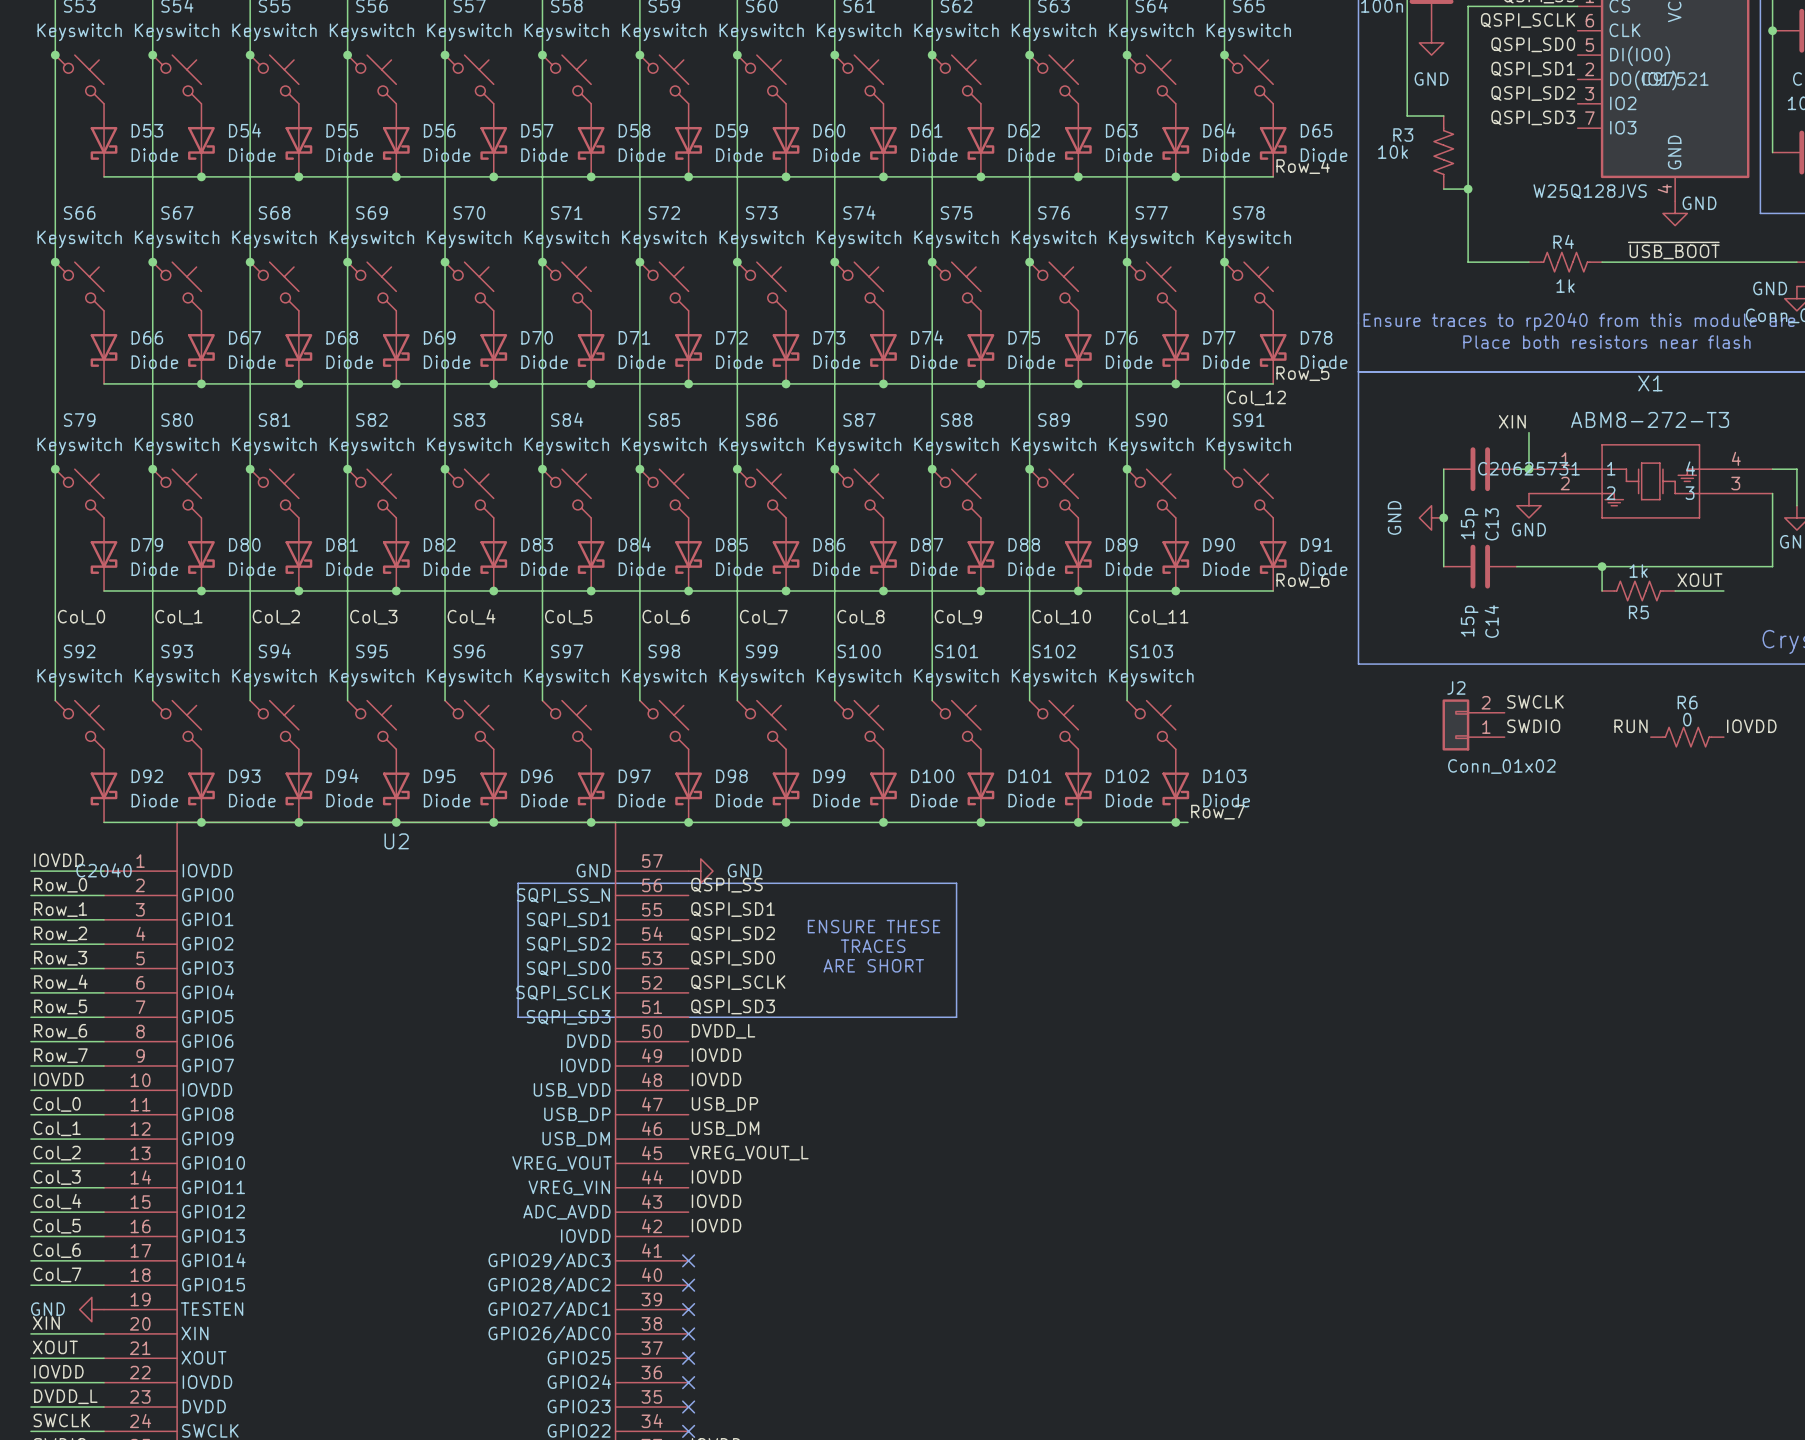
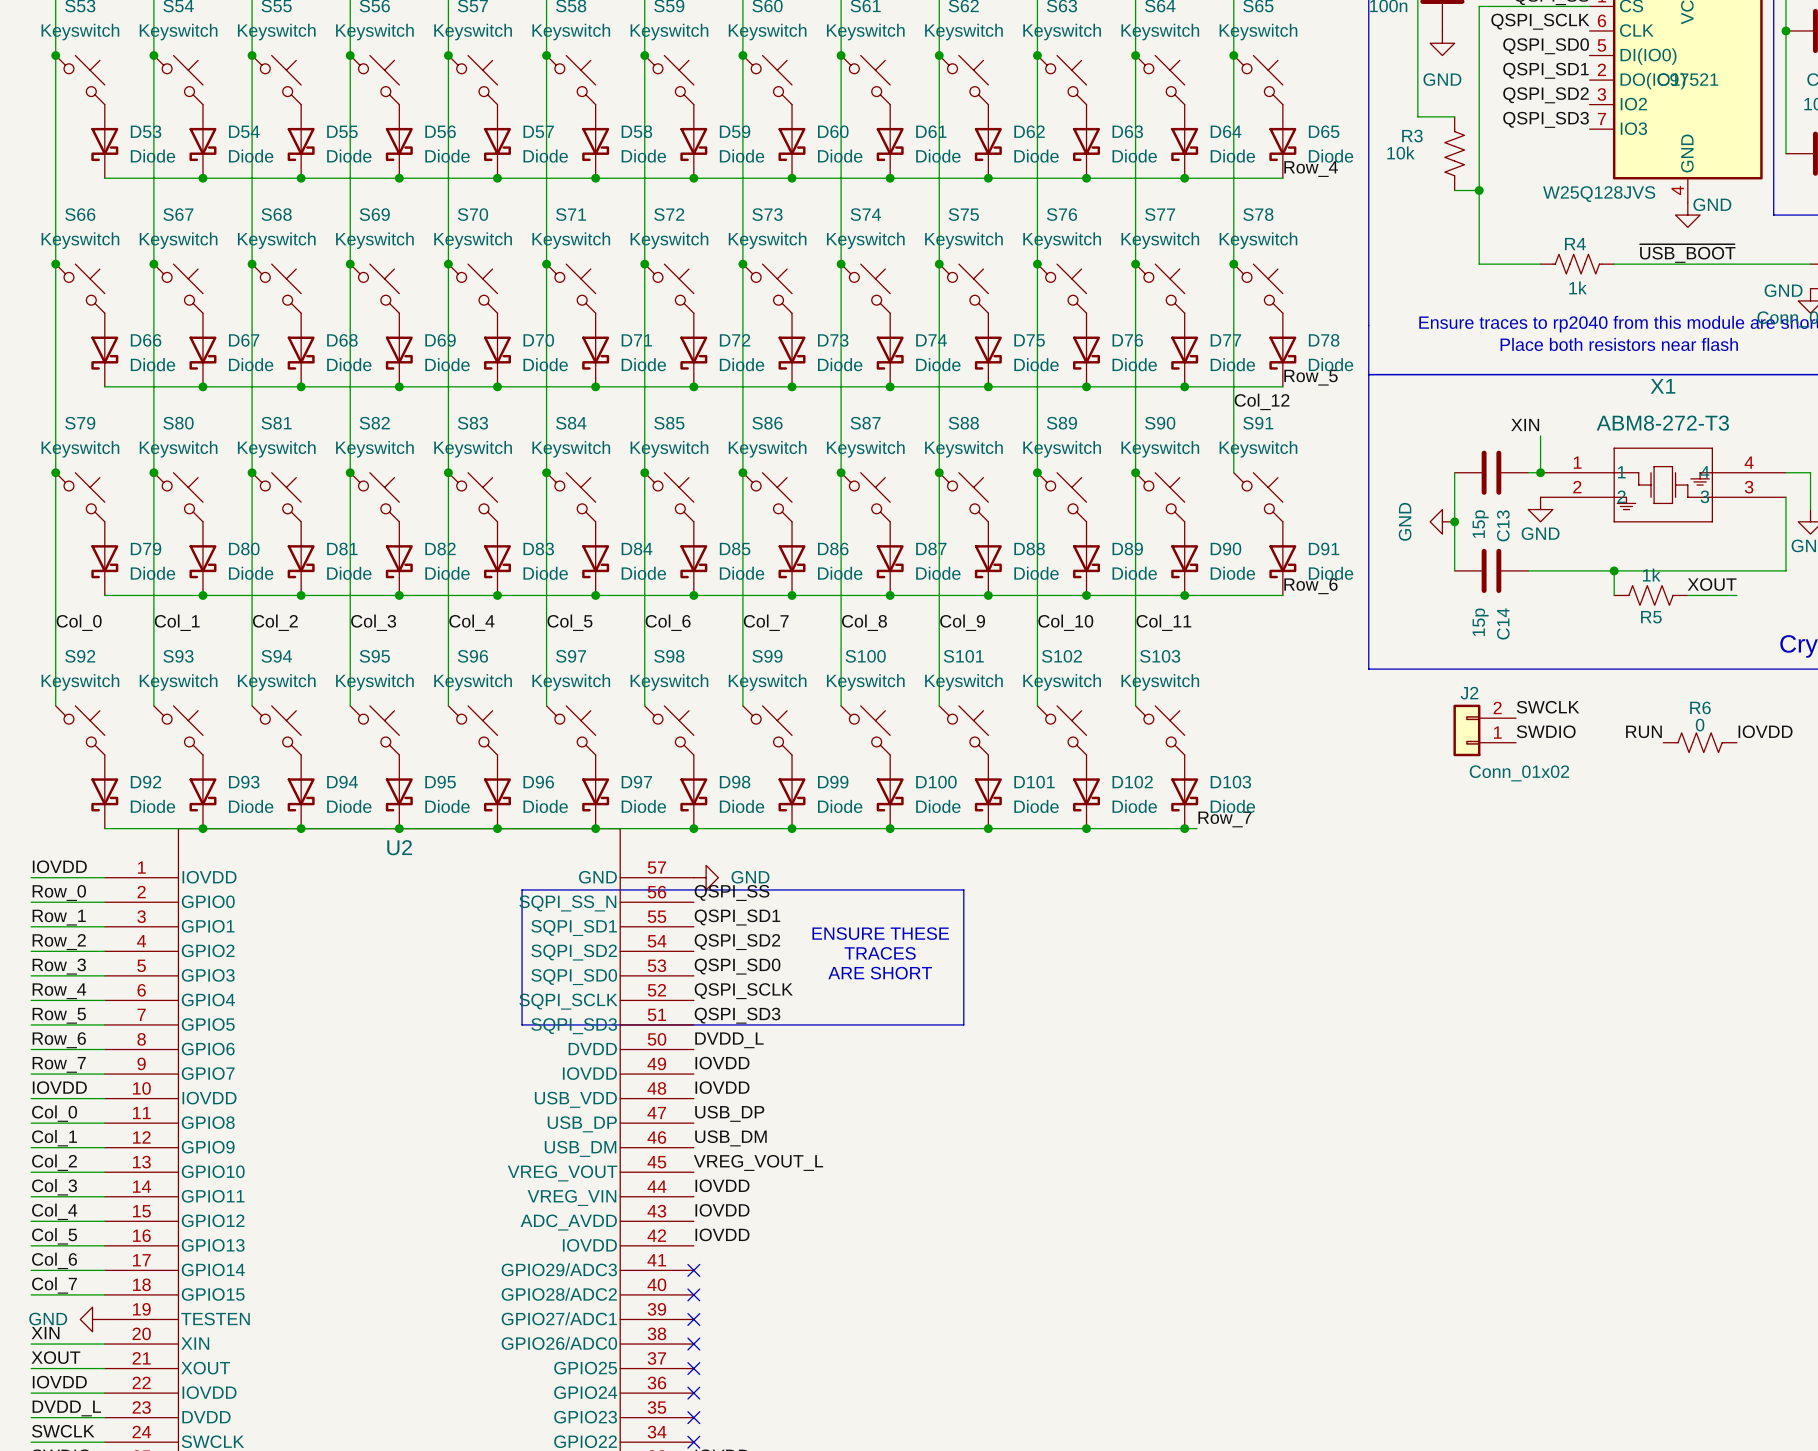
X1 text: C20625731 (1528, 468) -> none
U2 text: C2040 (104, 870) -> none

